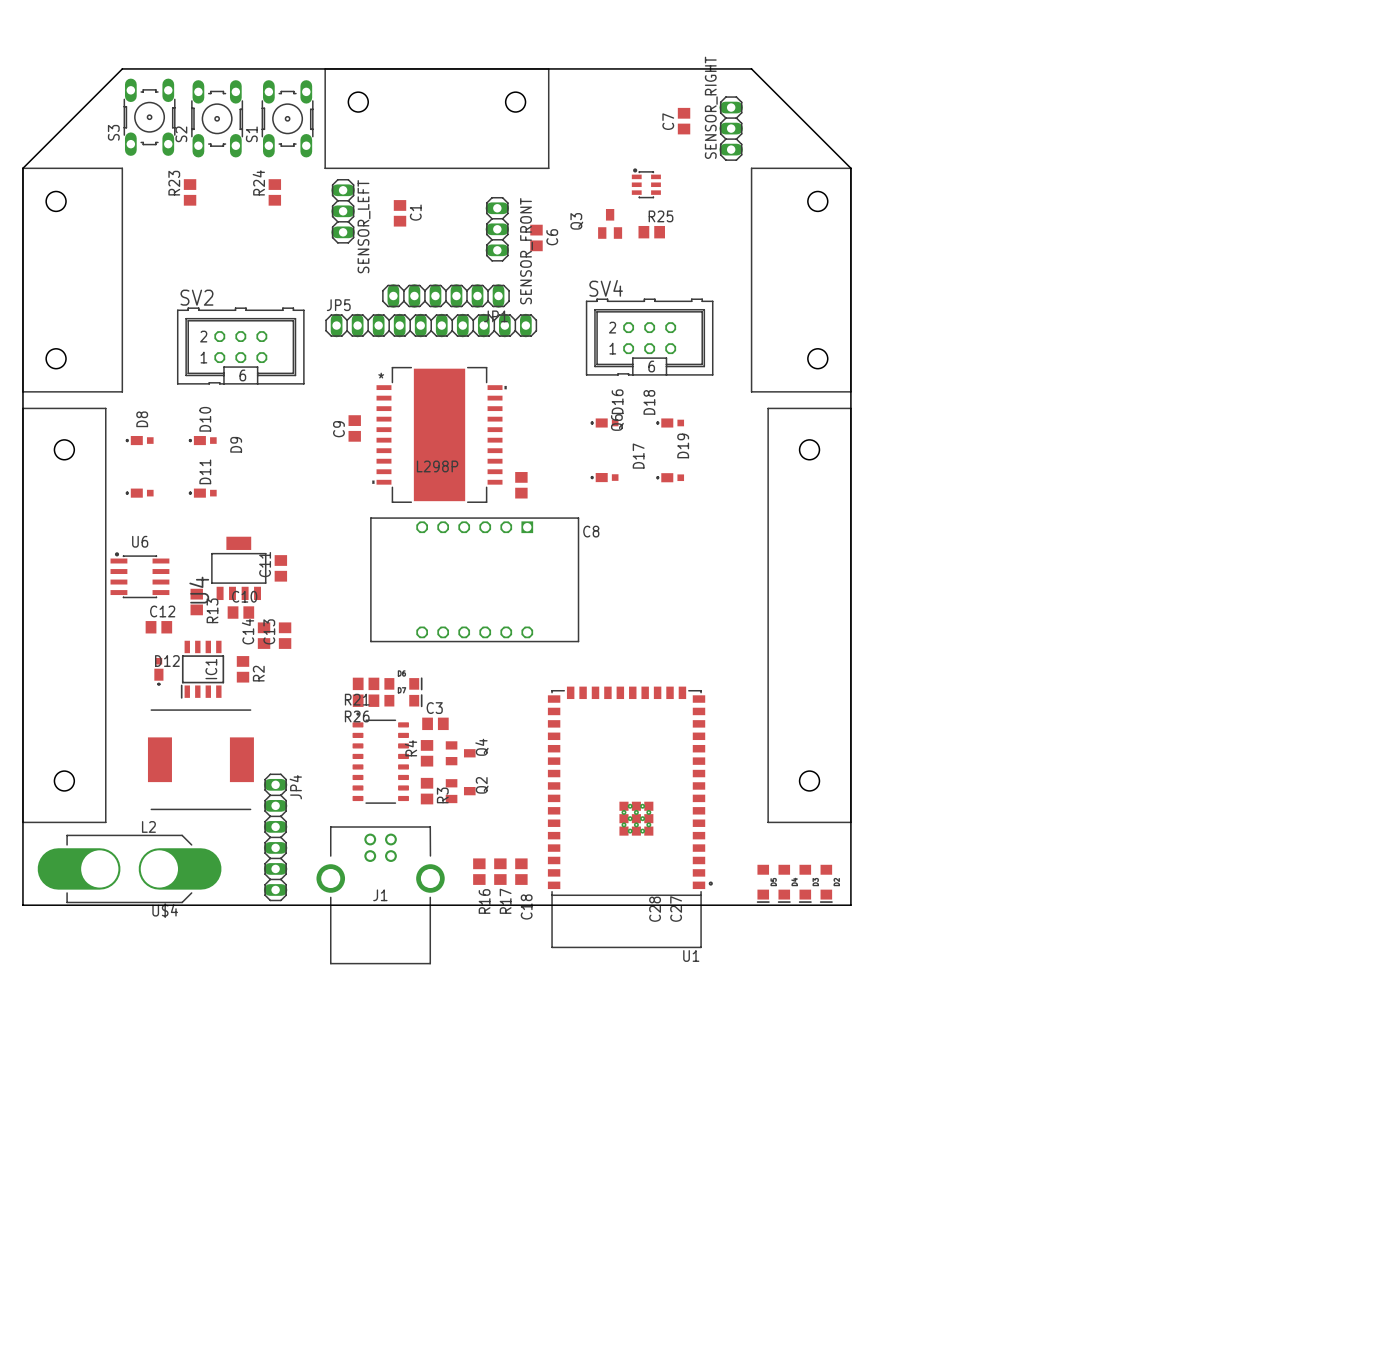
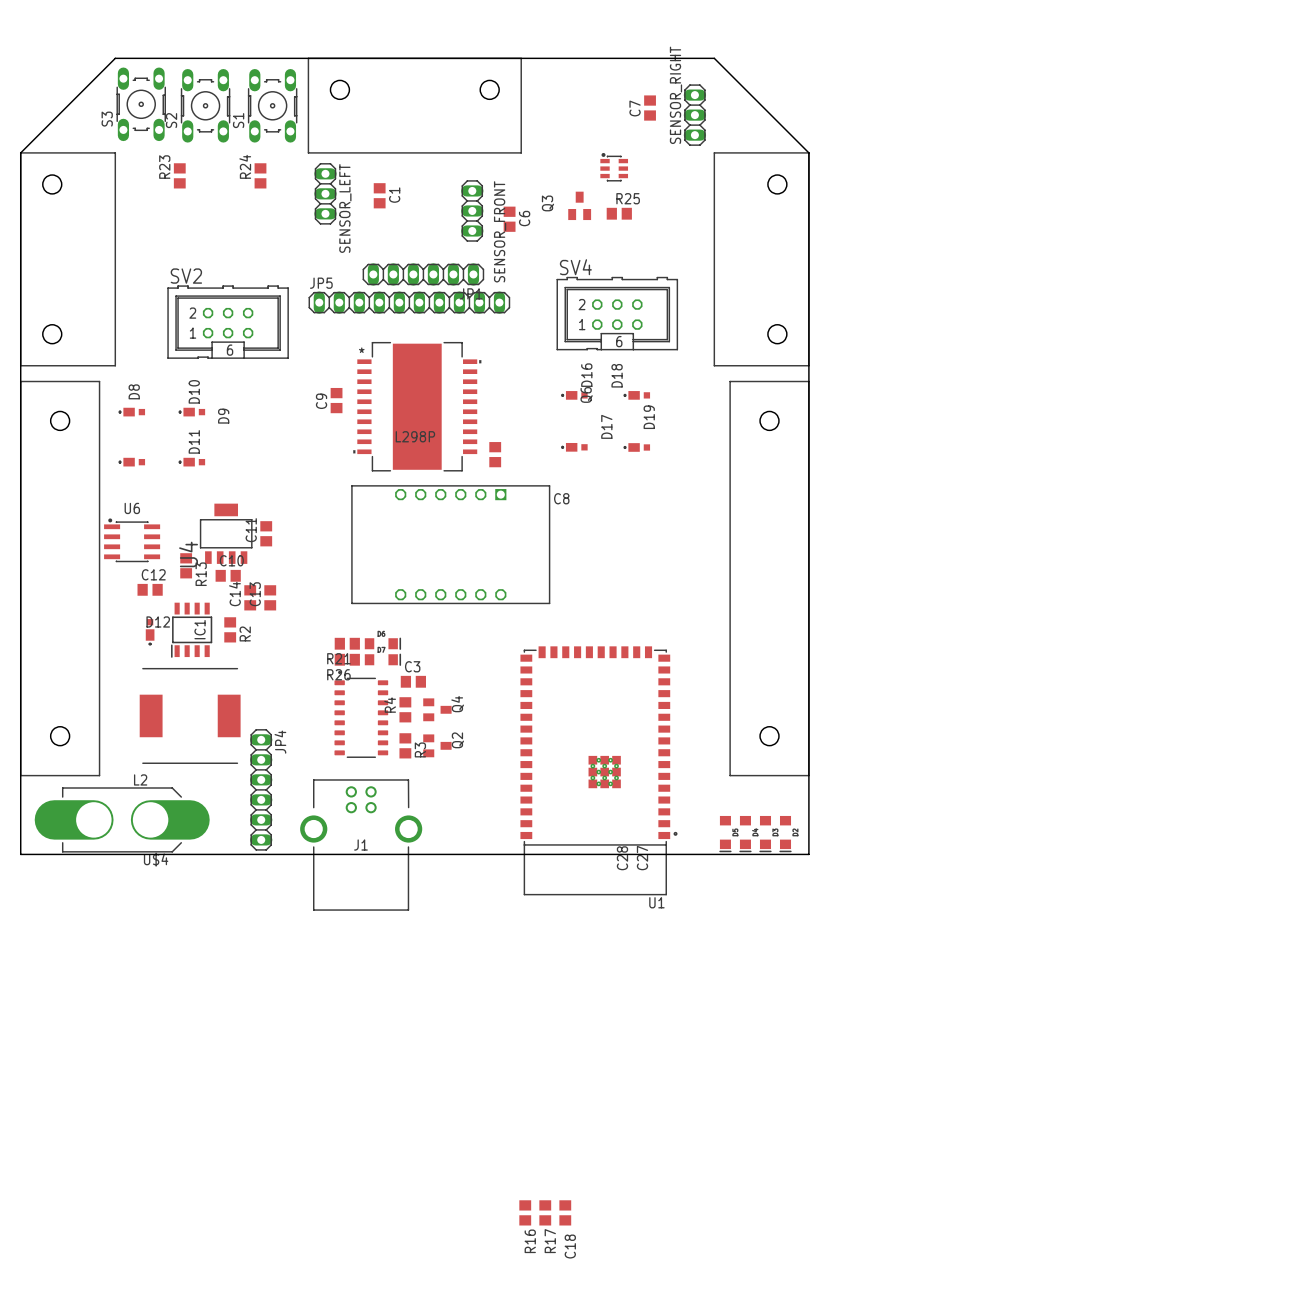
R16 position: (479, 871) -> (525, 1212)
R17 position: (500, 871) -> (545, 1212)
C18 position: (521, 871) -> (565, 1212)

